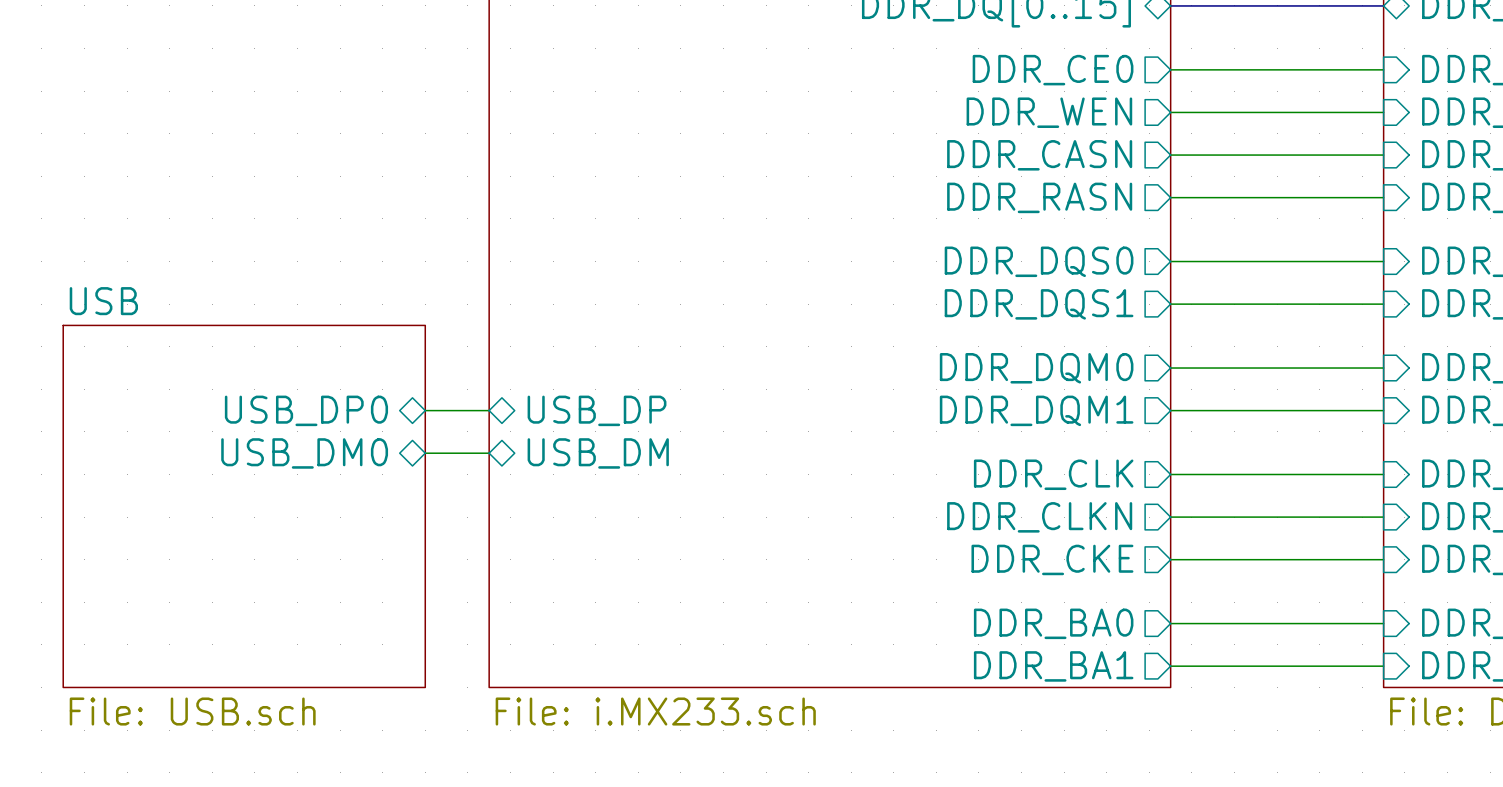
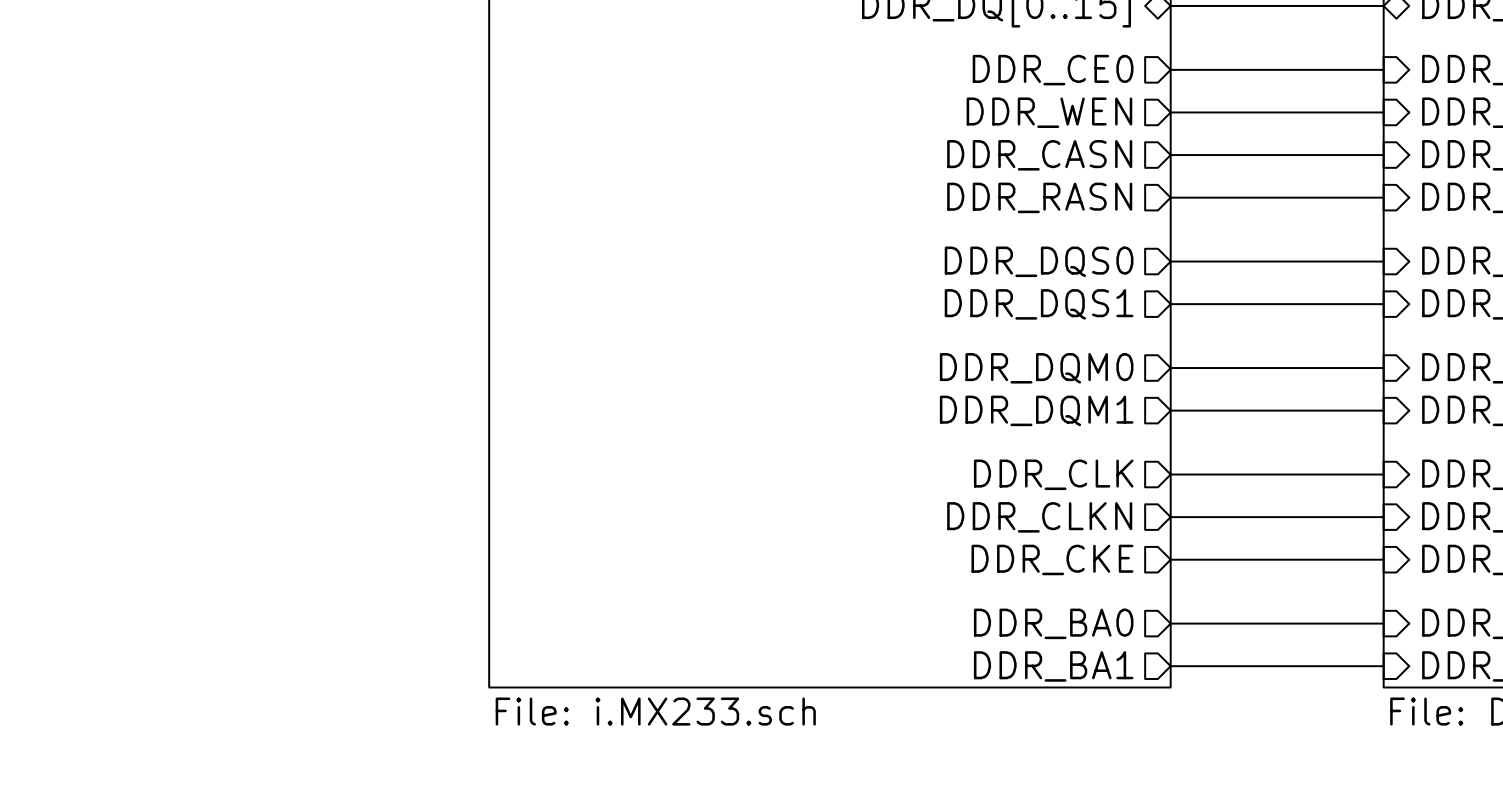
sheet pin: USB_DP0 (306, 410) -> none
wire: (425, 410) (489, 410) -> none
sheet pin: USB_DP (597, 410) -> none
sheet pin: USB_DM0 (304, 453) -> none
wire: (425, 453) (489, 453) -> none
sheet pin: USB_DM (598, 453) -> none
sheet USB: File: USB.sch (244, 506) -> none

